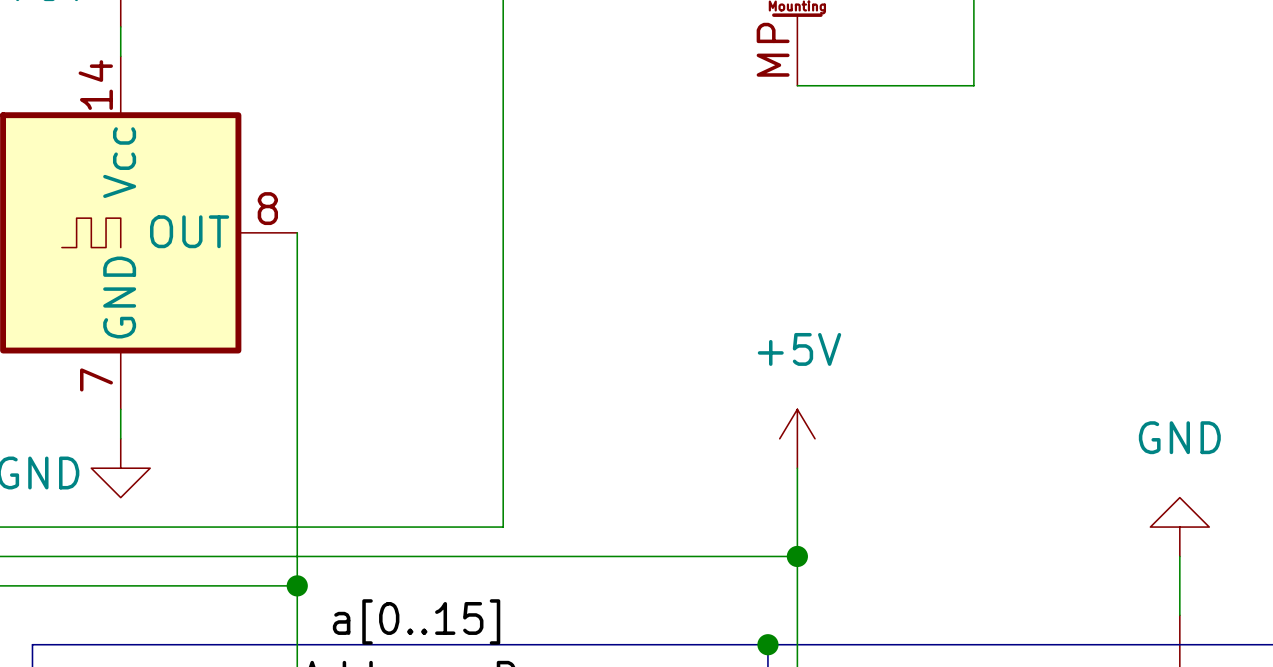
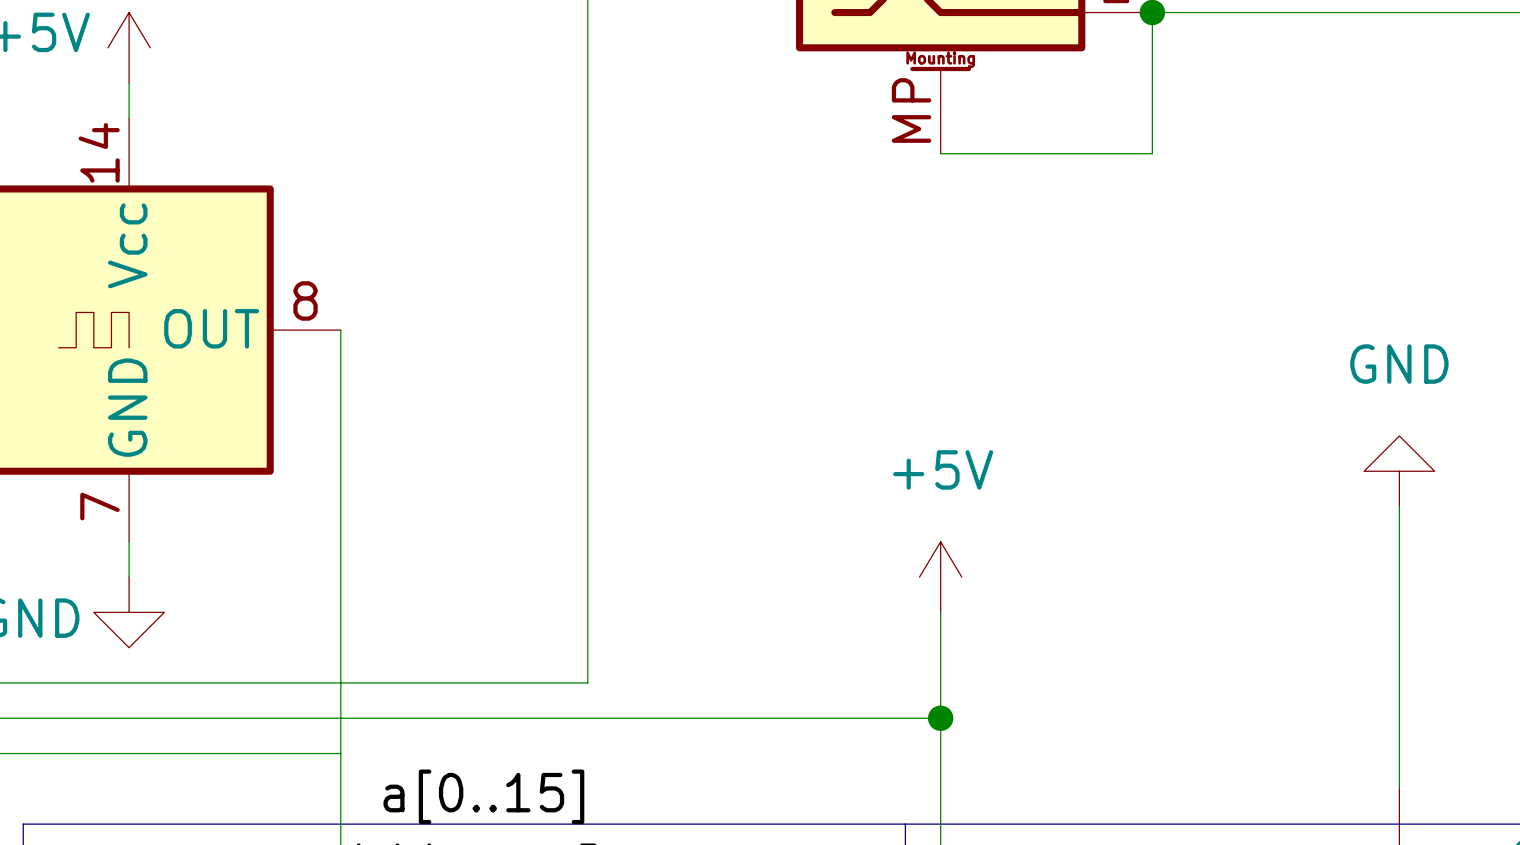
wire: none -> (1399, 506) (1399, 718)
power symbol position: GND (1179, 527) -> GND (1399, 471)
junction: (297, 585) -> none
junction: (767, 644) -> none

